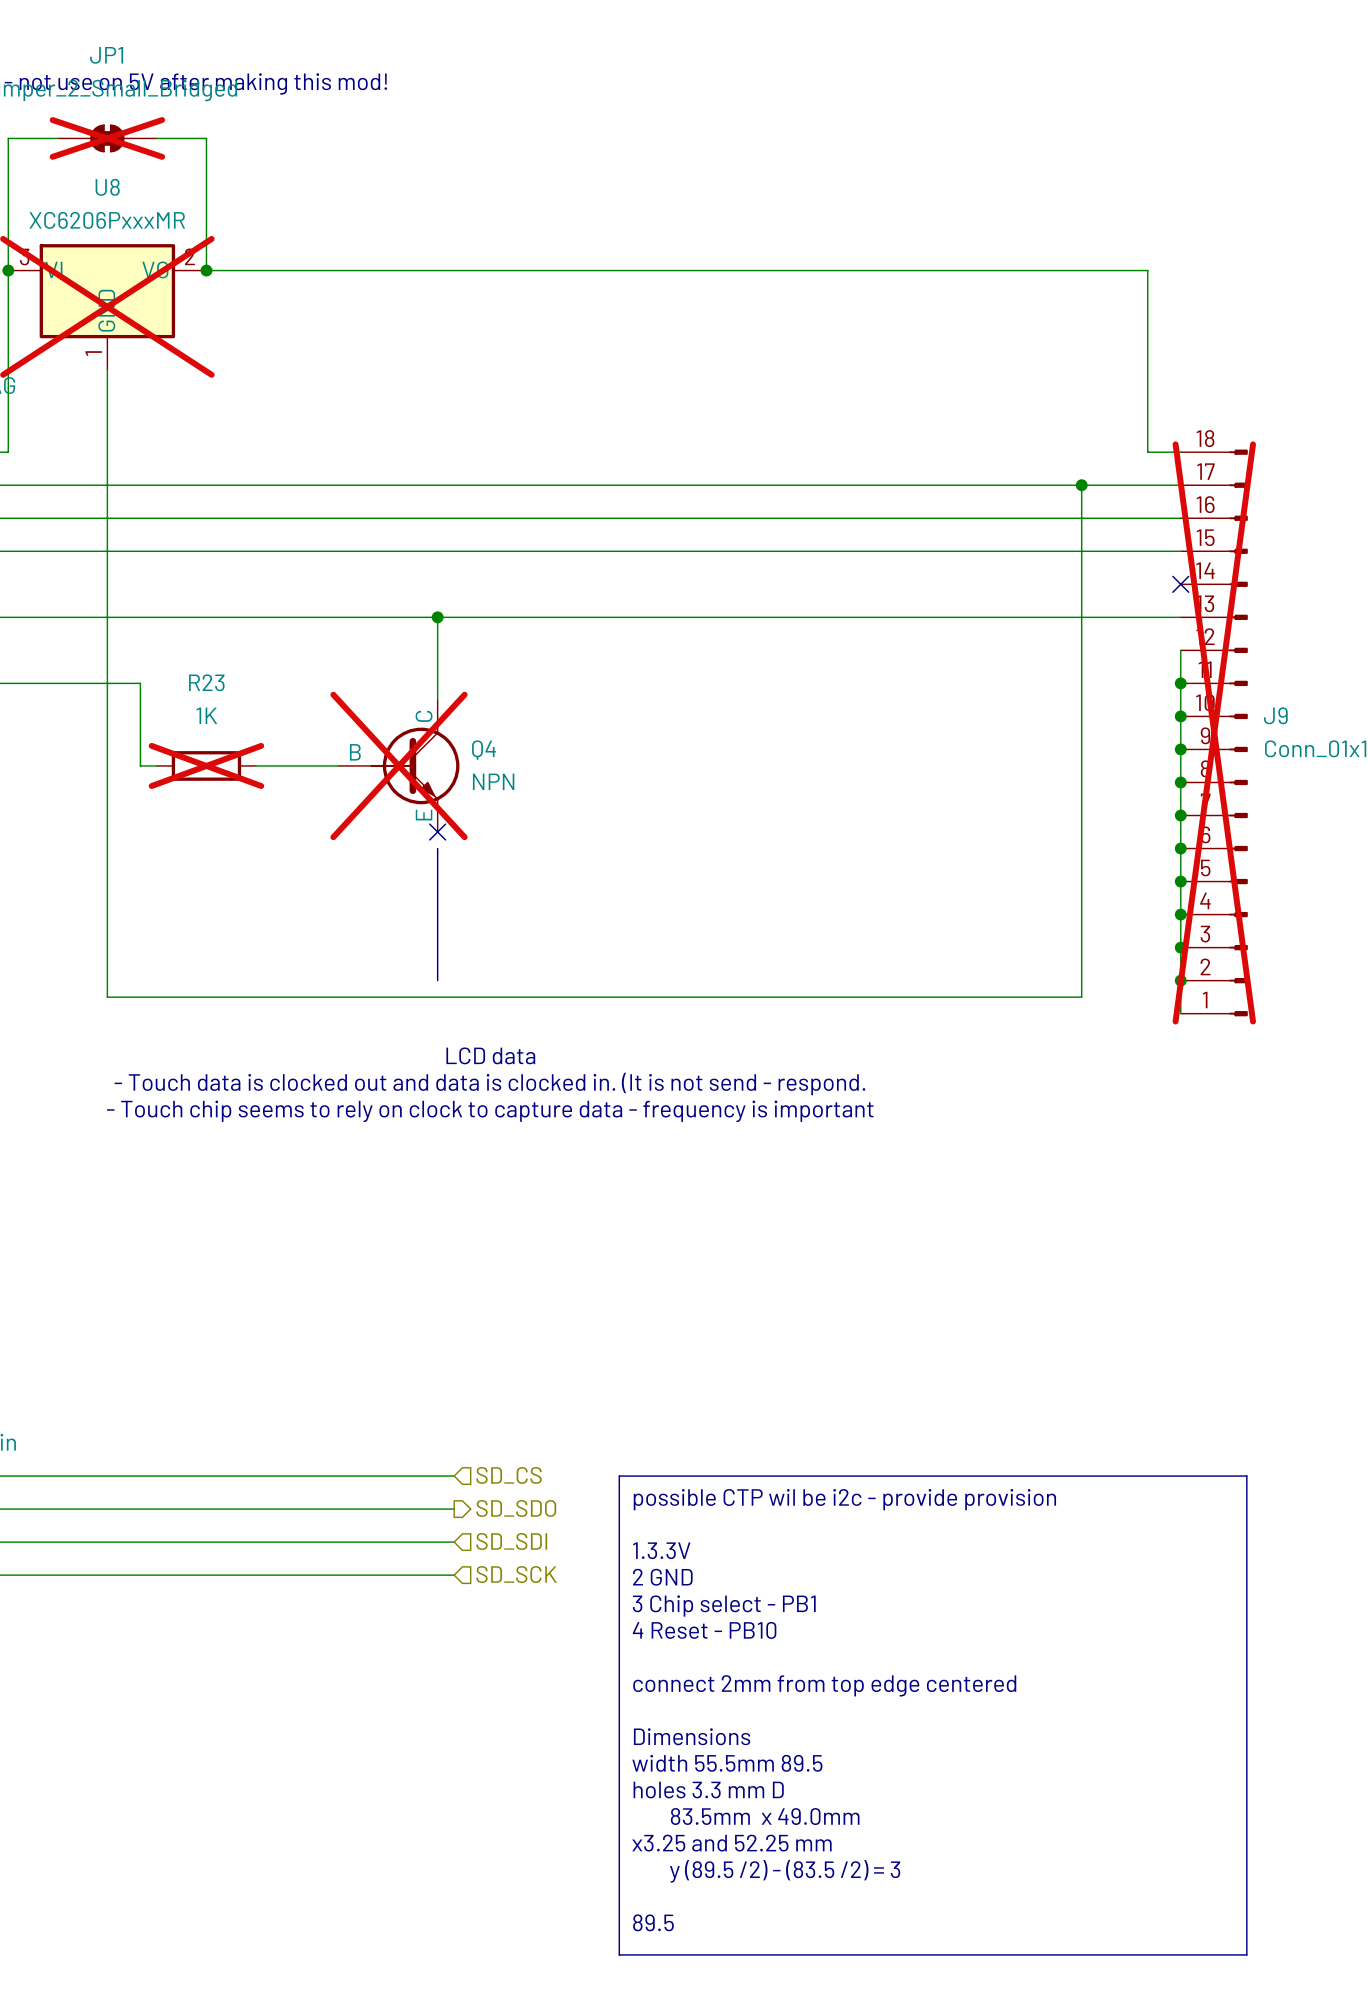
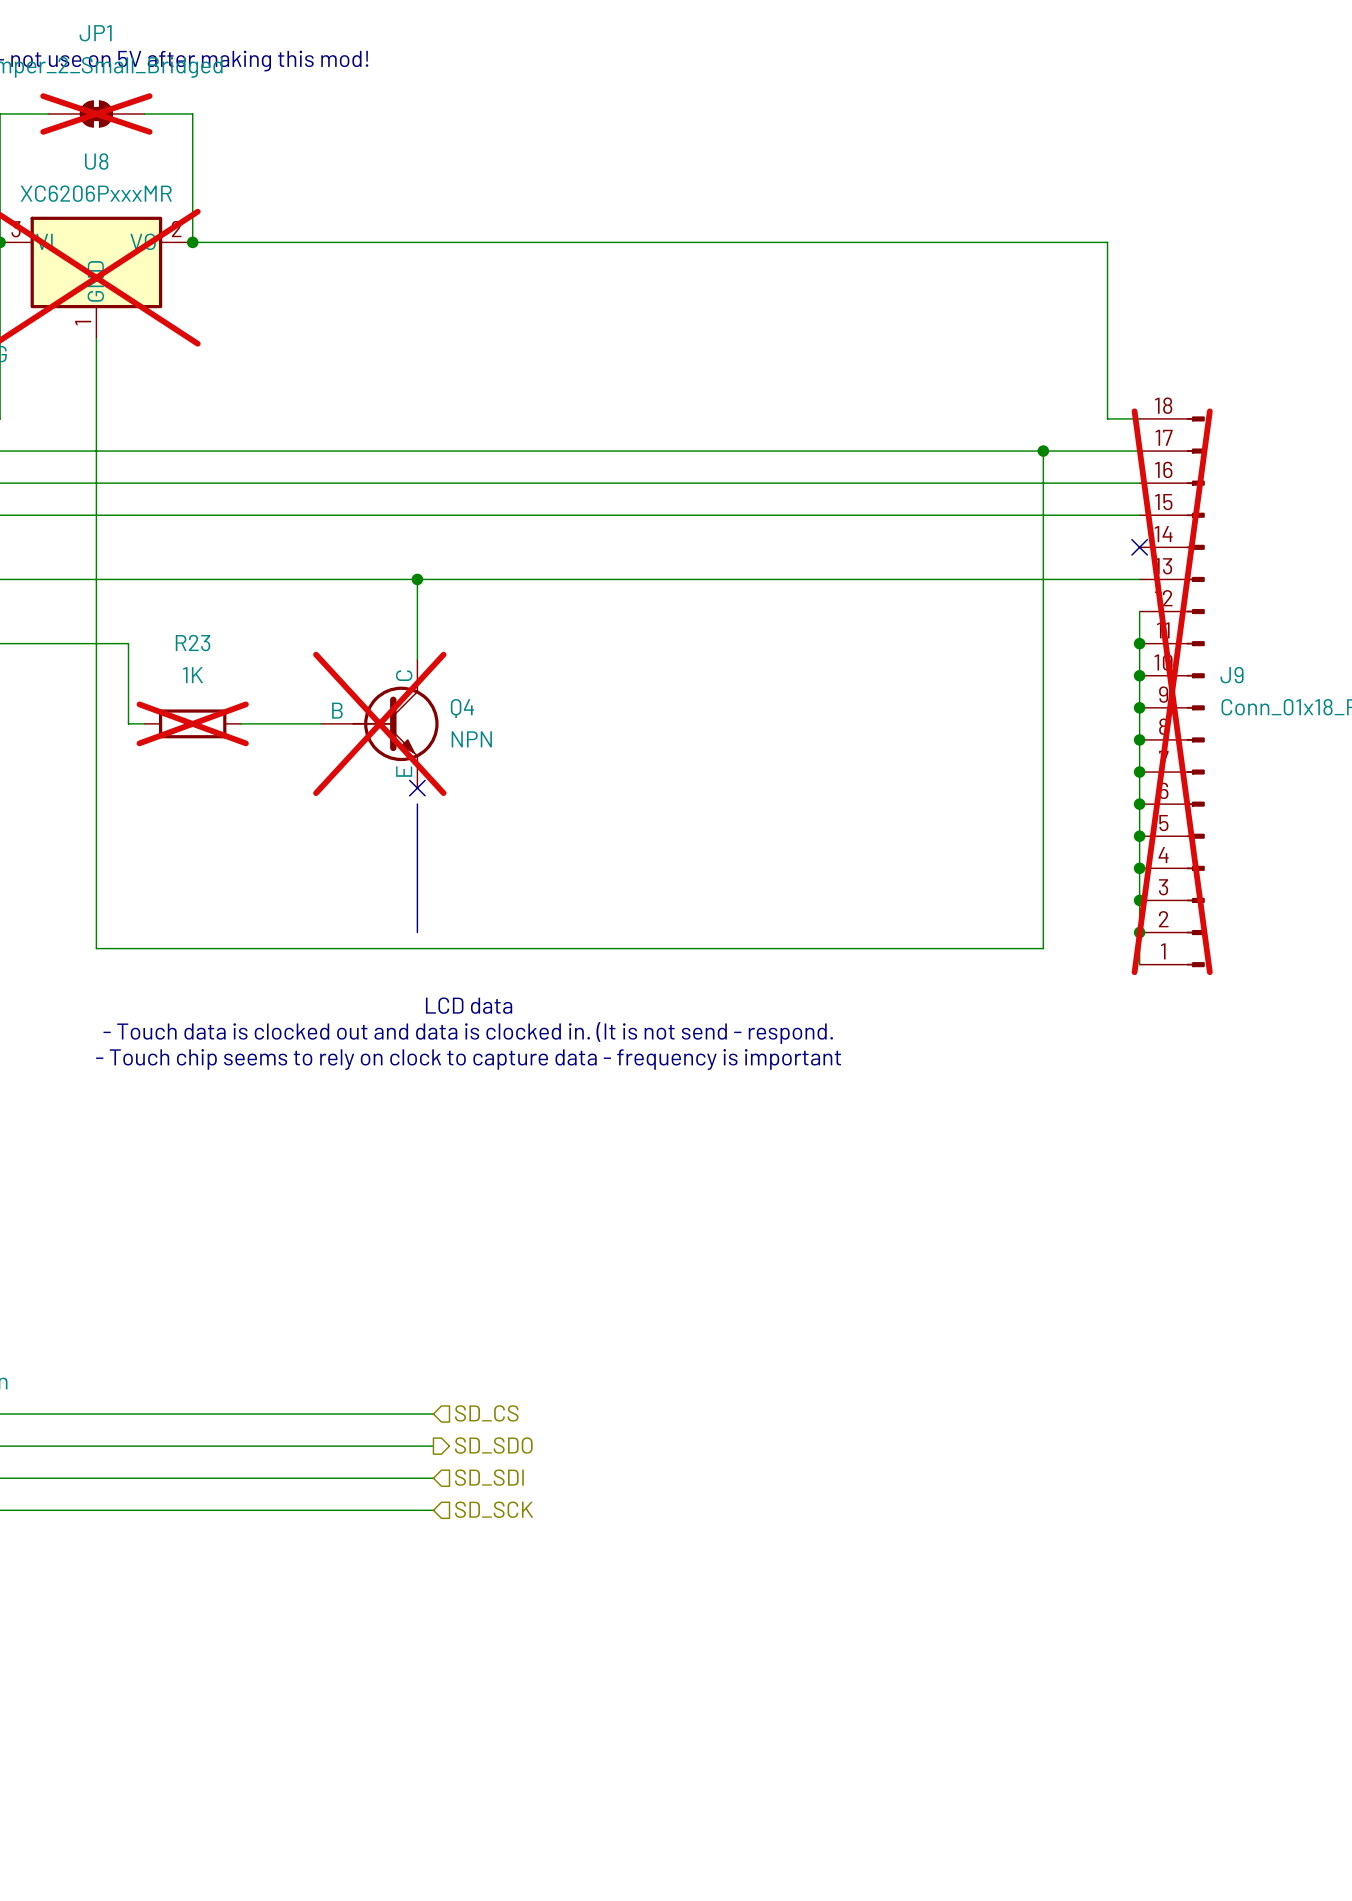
line: (619, 1476) (1246, 1476) (1246, 1954) (619, 1954) (619, 1476) -> none
text: possible CTP wil be i2c - provide provision (844, 1499) -> none
text: 1.3.3V (661, 1550) -> none
text: 2 GND (662, 1577) -> none
text: 3 Chip select - PB1 (724, 1606) -> none
text: 4 Reset - PB10 (704, 1630) -> none
text: connect 2mm from top edge centered (824, 1685) -> none
text: Dimensions (692, 1736) -> none
text: width 55.5mm 89.5 (727, 1763) -> none
text: holes 3.3 mm D (708, 1790) -> none
text: 83.5mm x 49.0mm (765, 1816) -> none
text: x3.25 and 52.25 mm (731, 1843) -> none
text: y (89.5 /2) - (83.5 /2) = 3 (785, 1871) -> none
text: 89.5 (653, 1922) -> none

